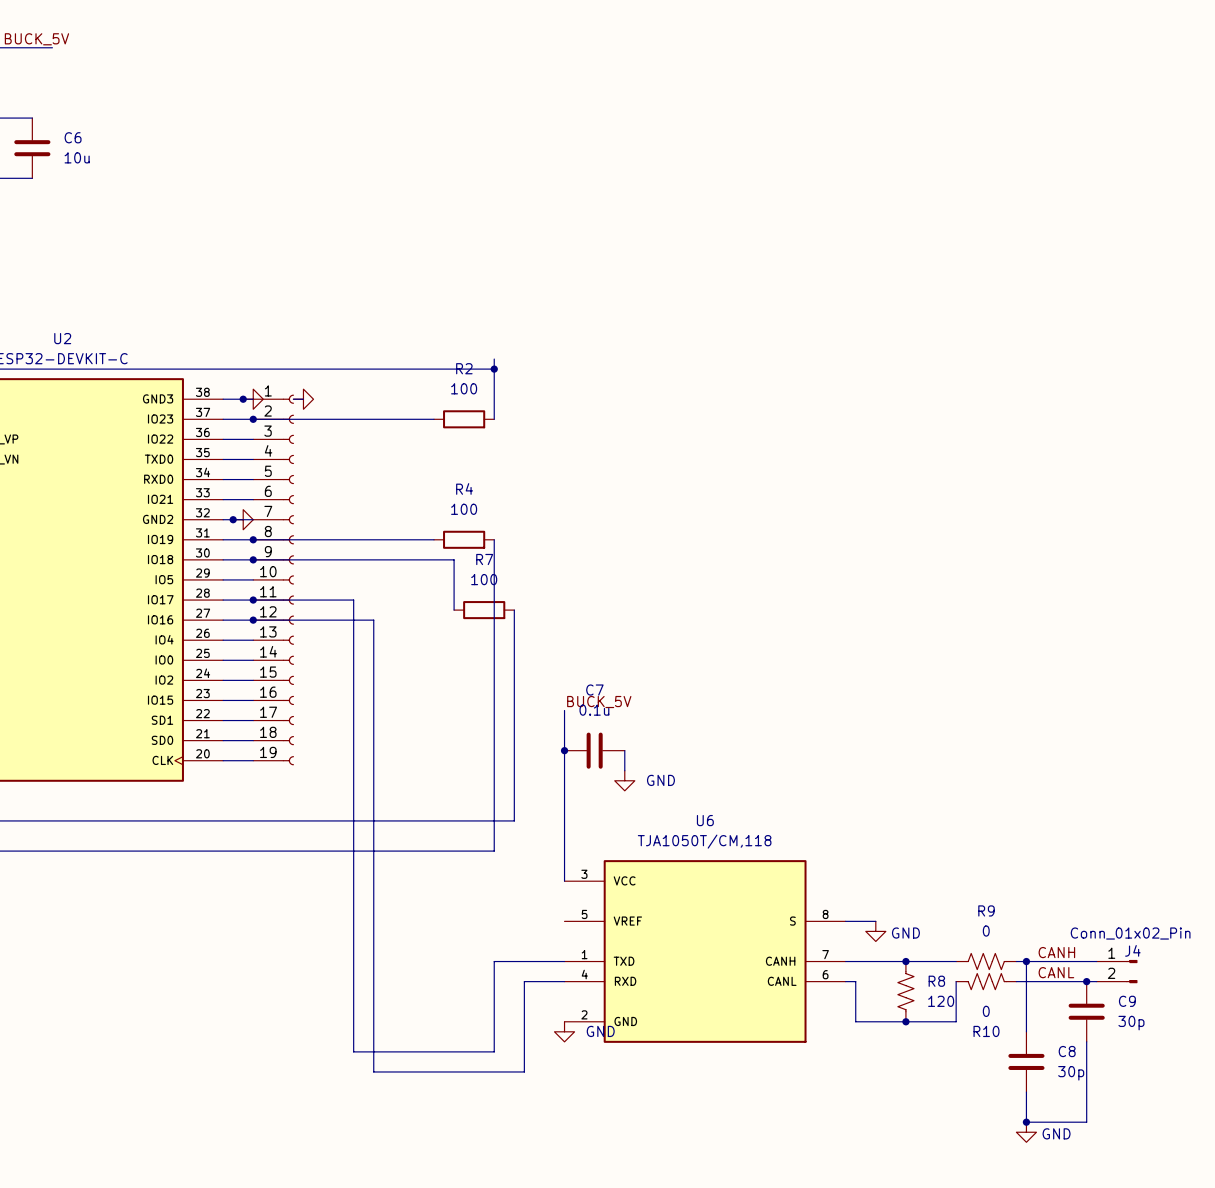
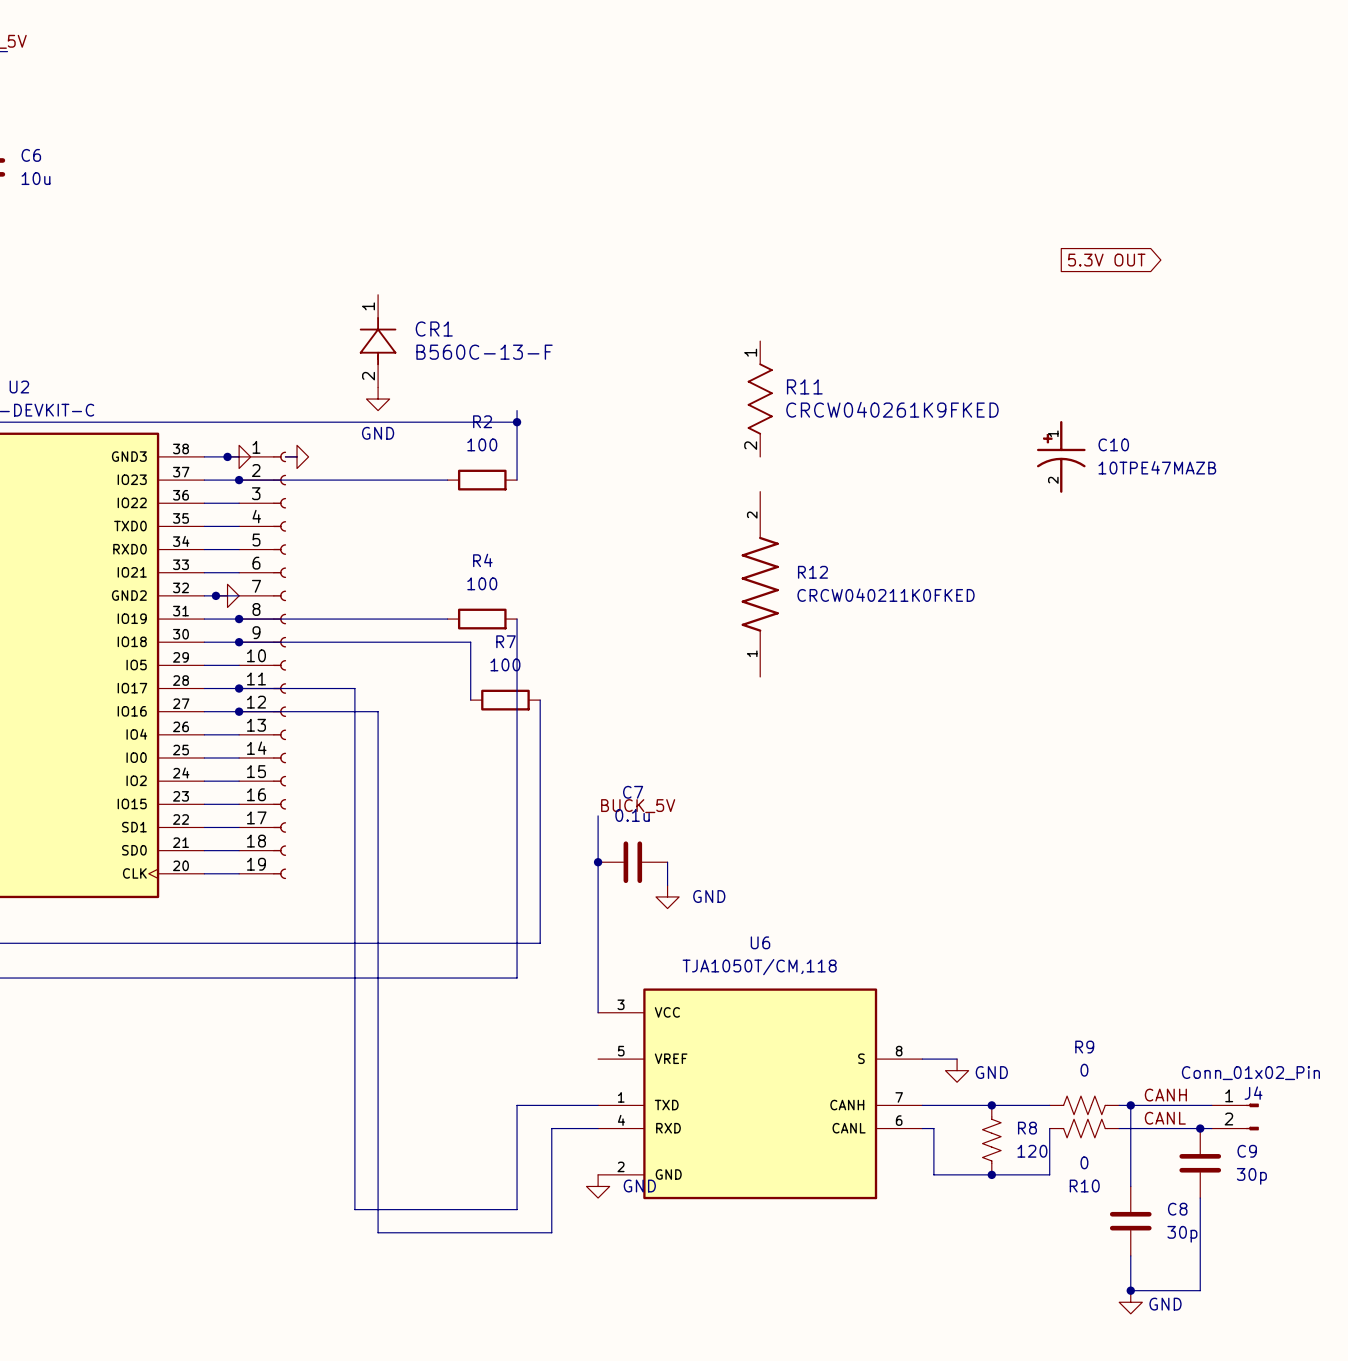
global label: none -> 5.3V OUT (1106, 260)
CR1: none -> B560C-13-F (378, 341)
power symbol: none -> GND (378, 399)
R11: none -> CRCW040261K9FKED (760, 399)
C10: none -> 10TPE47MAZB (1061, 456)
R12: none -> CRCW040211K0FKED (760, 584)

